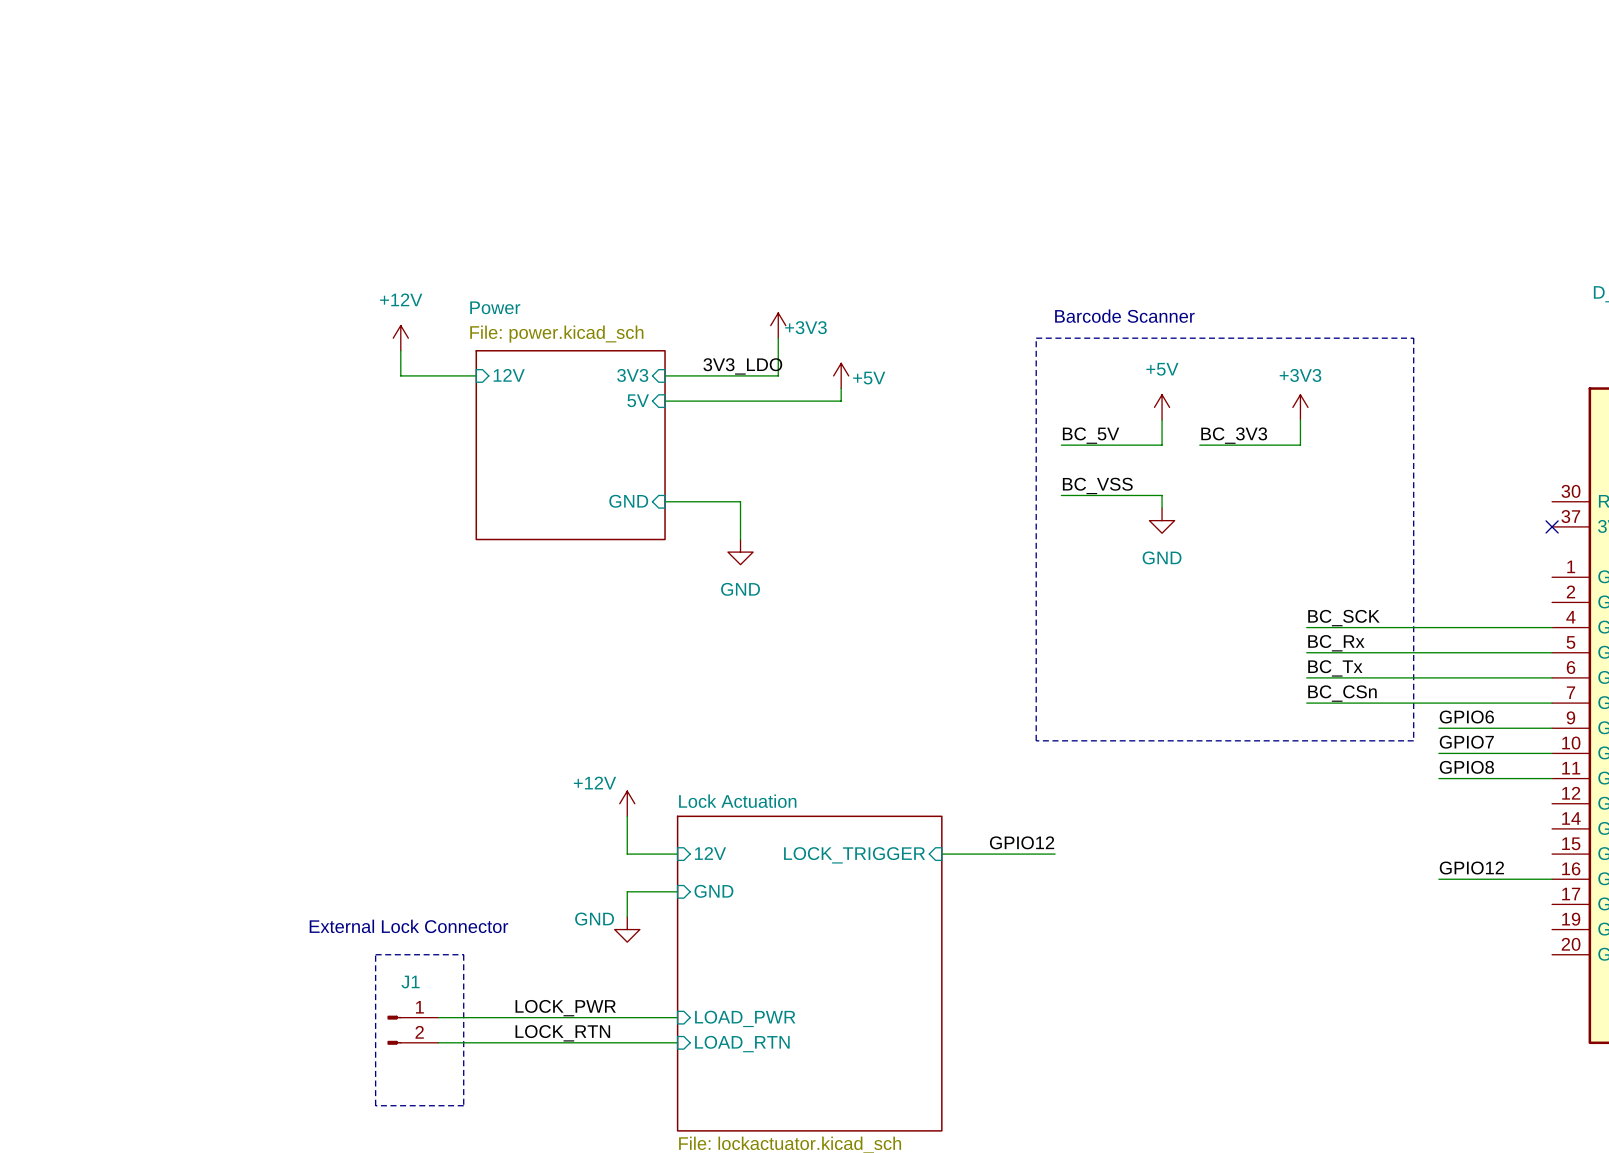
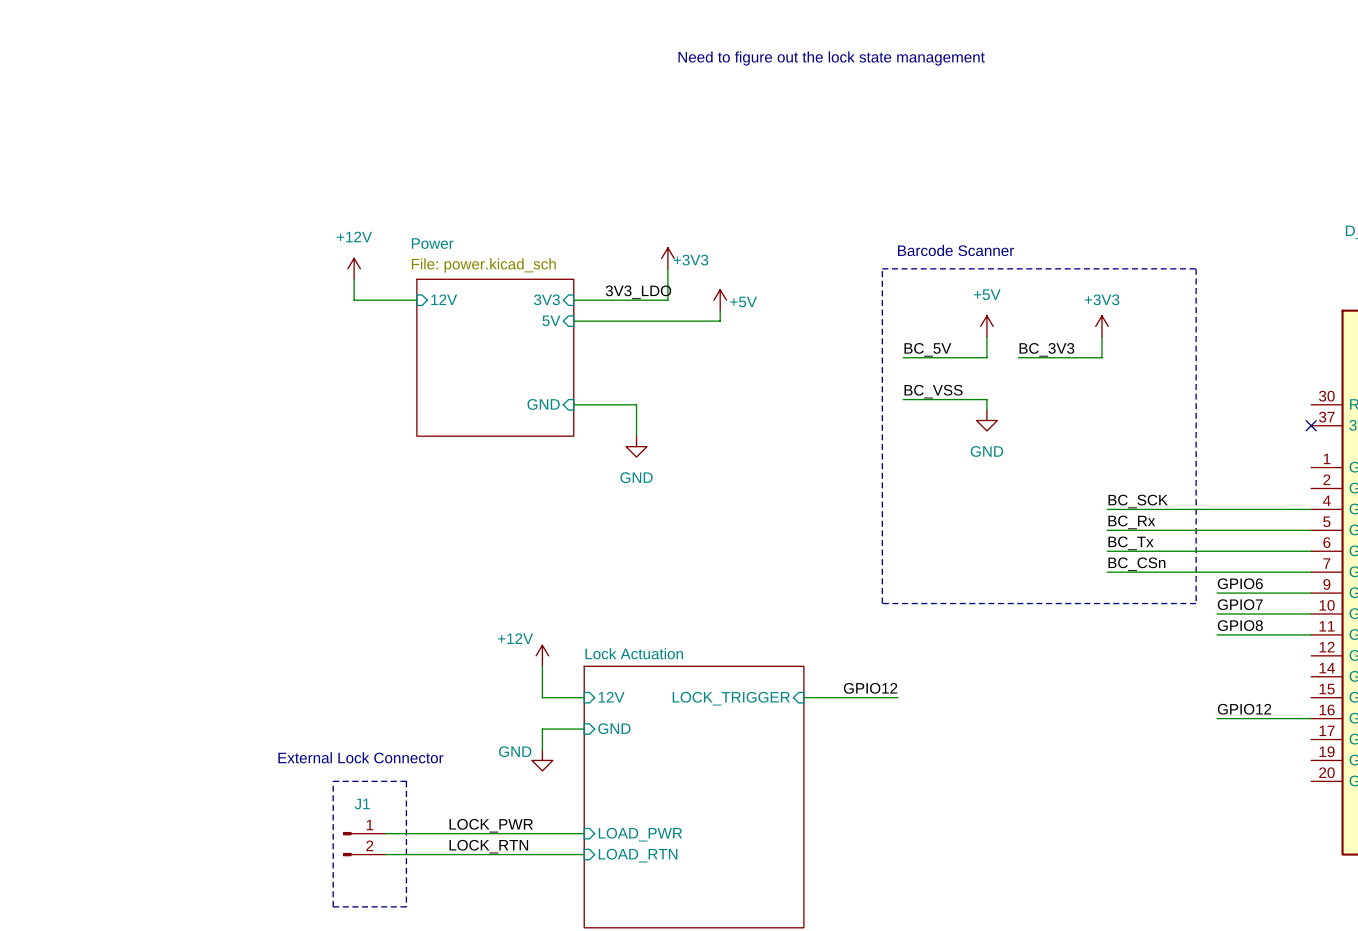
text: none -> Need to figure out the lock state management (831, 58)

